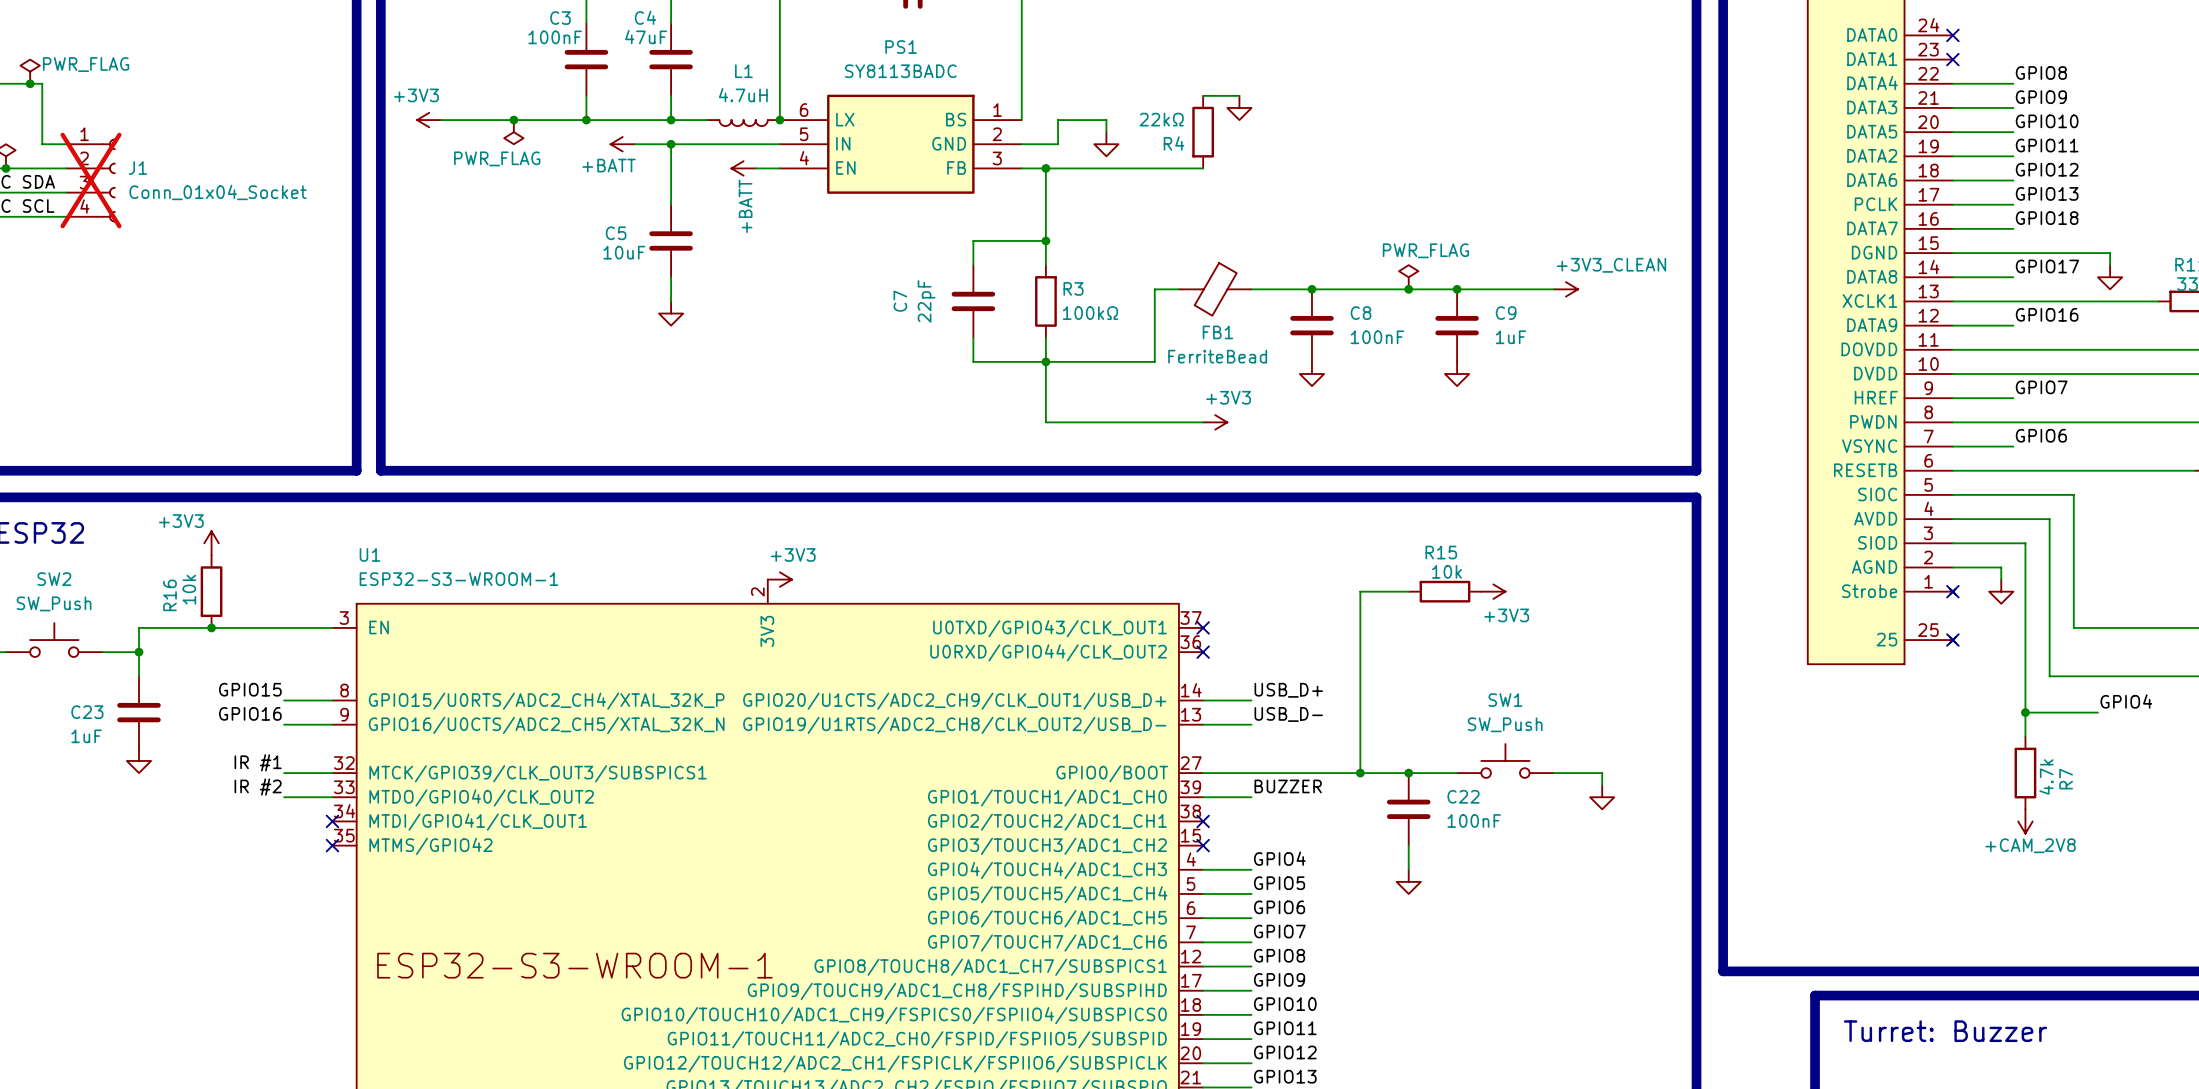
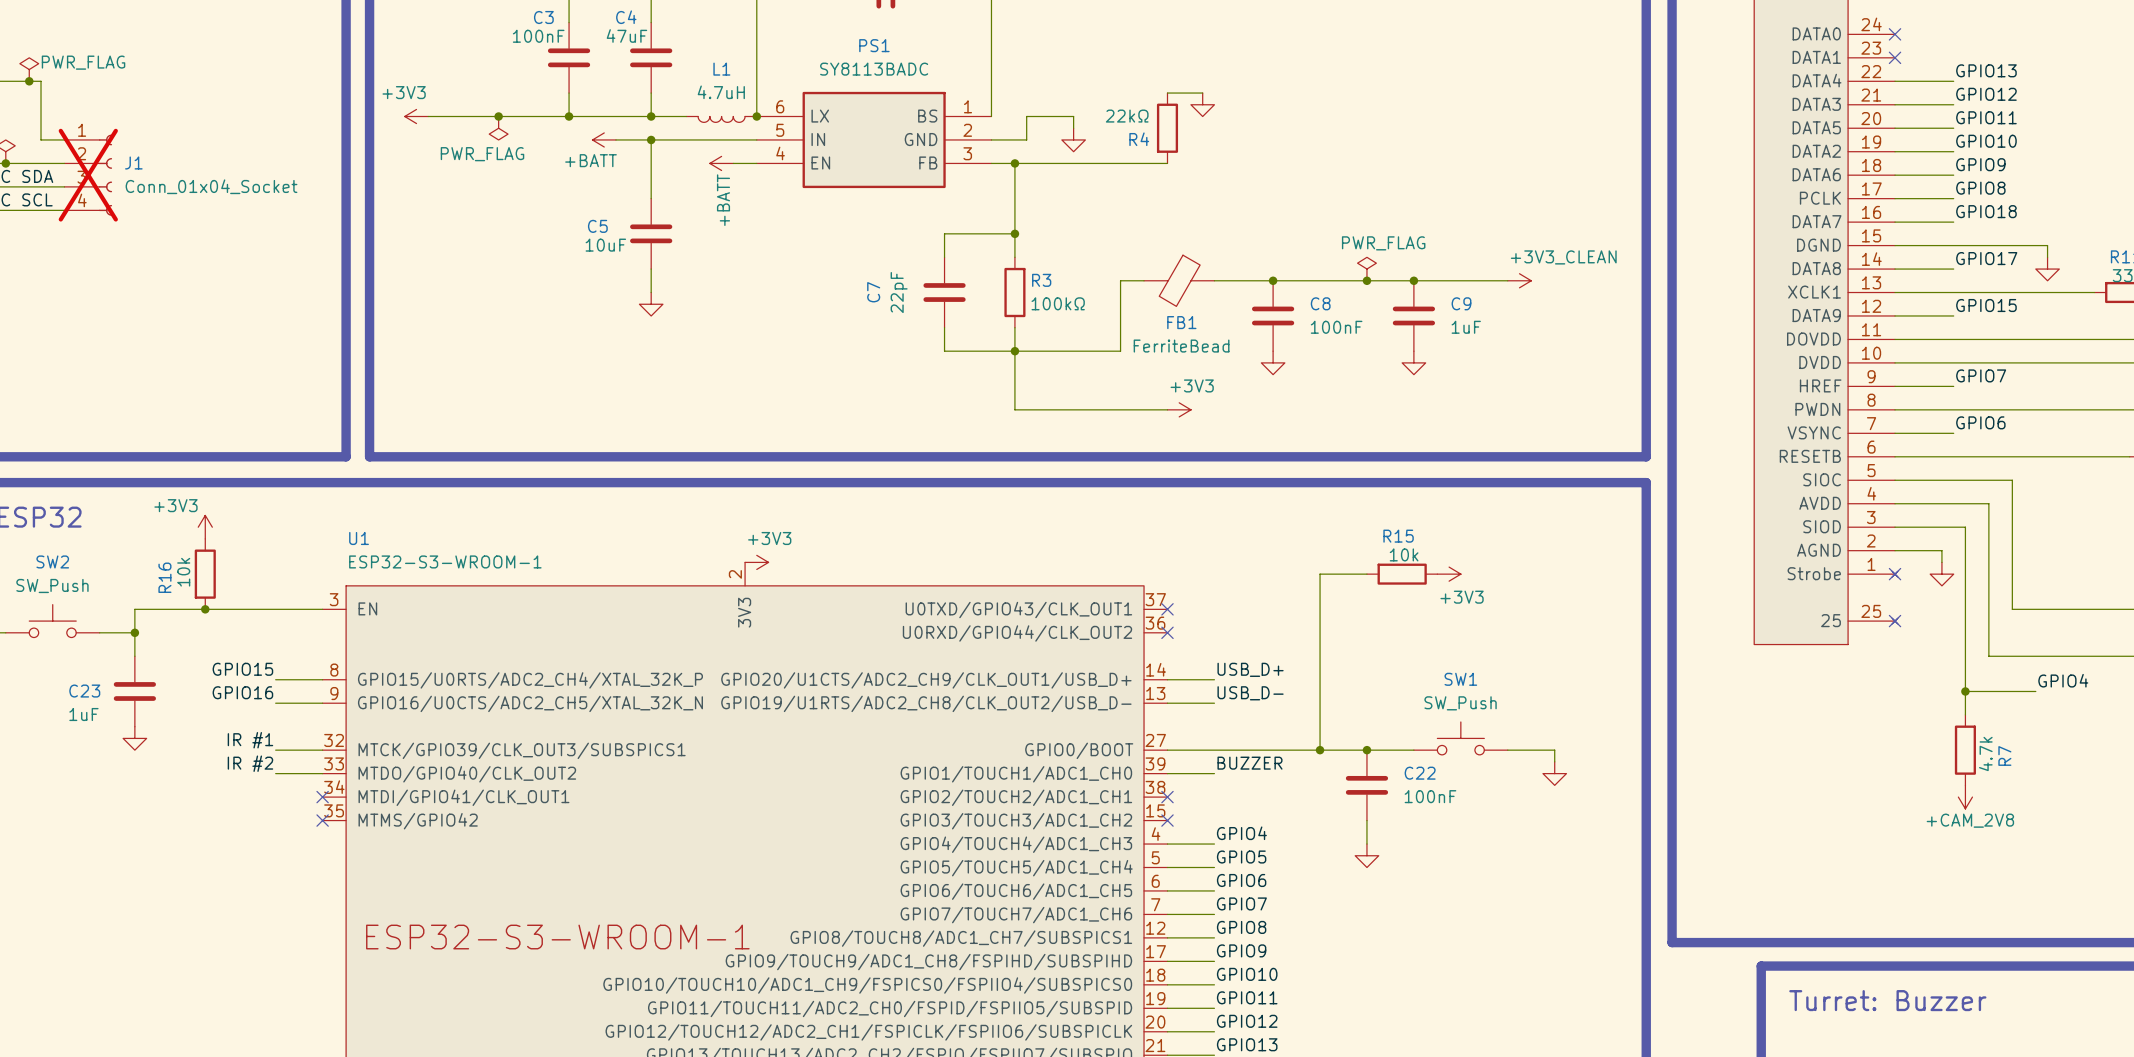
label: GPIO8 (2041, 72) -> GPIO13 (1986, 70)
label: GPIO9 (2041, 97) -> GPIO12 (1986, 94)
label: GPIO10 (2047, 121) -> GPIO11 (1986, 117)
label: GPIO11 (2047, 145) -> GPIO10 (1986, 141)
label: GPIO12 (2047, 169) -> GPIO9 (1980, 164)
label: GPIO13 (2047, 193) -> GPIO8 (1980, 188)
label: GPIO16 (2047, 314) -> GPIO15 (1986, 305)

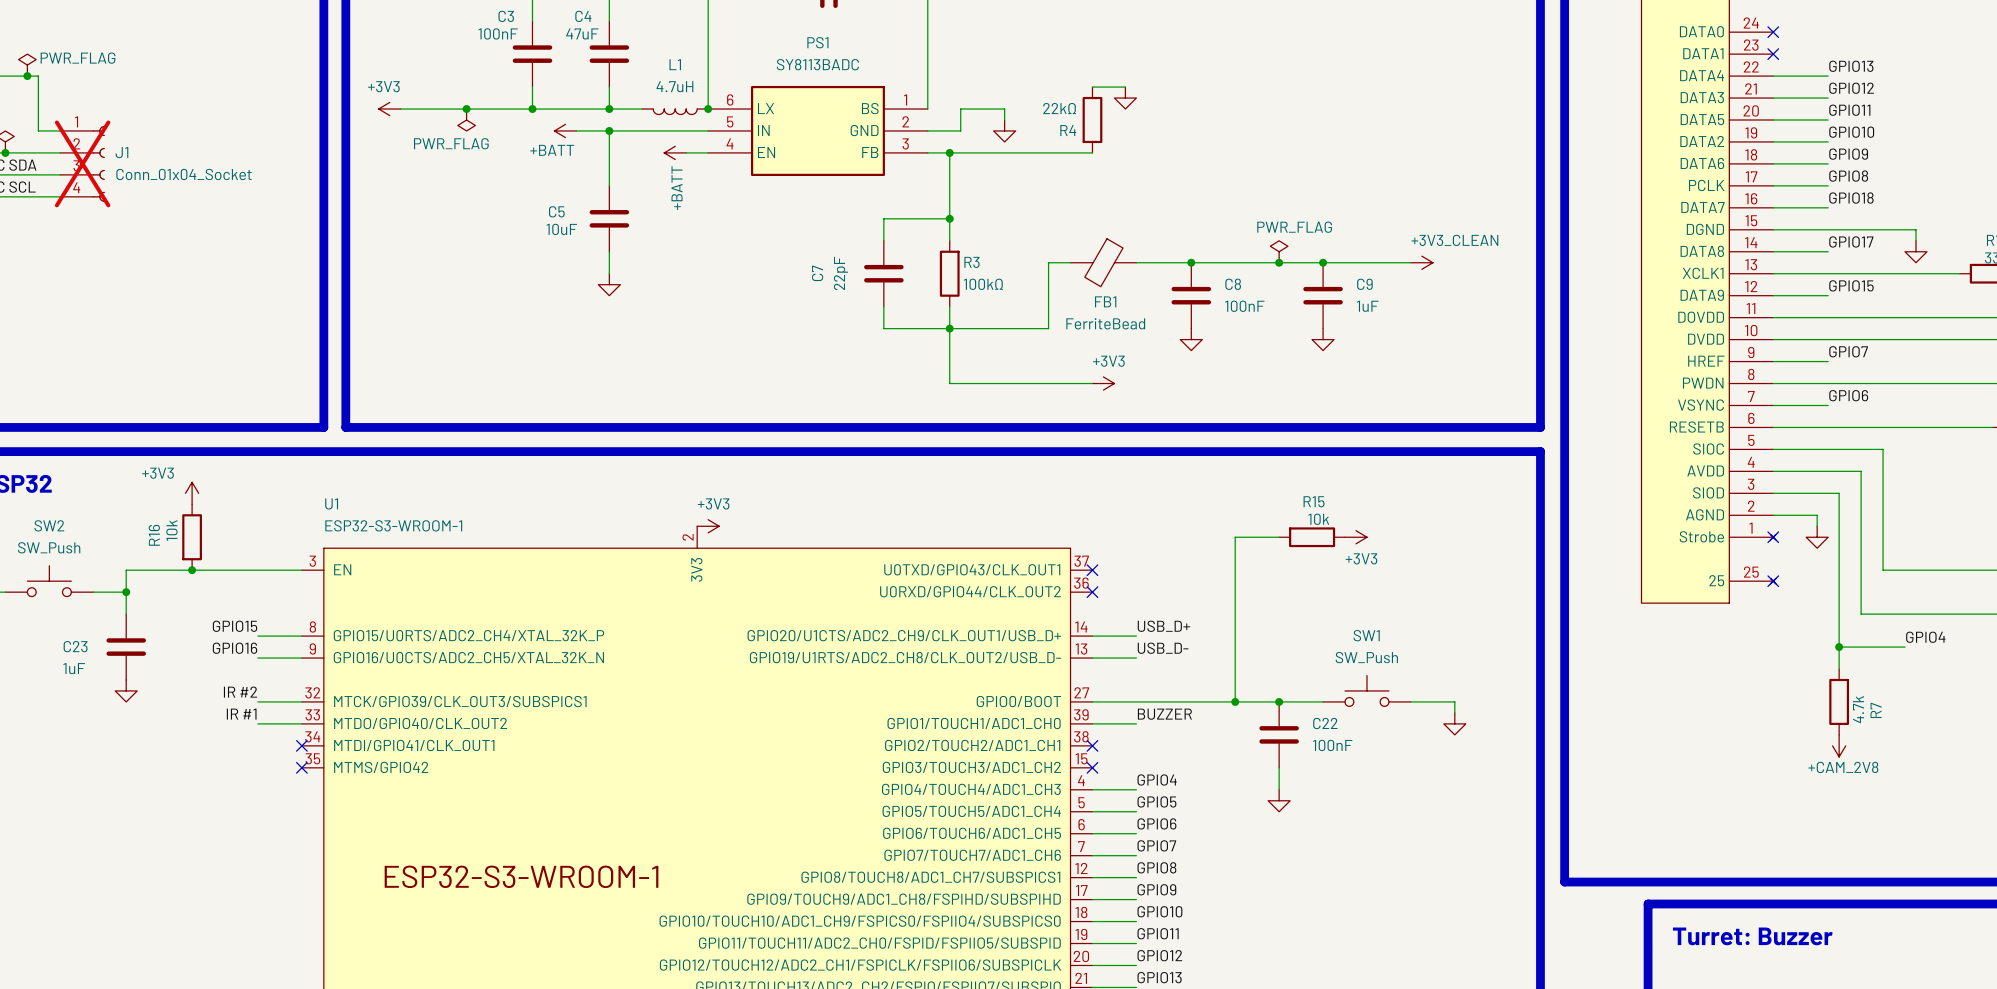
label: IR #1 (250, 740) -> IR #2 (240, 692)
label: IR #2 (250, 763) -> IR #1 (241, 714)

